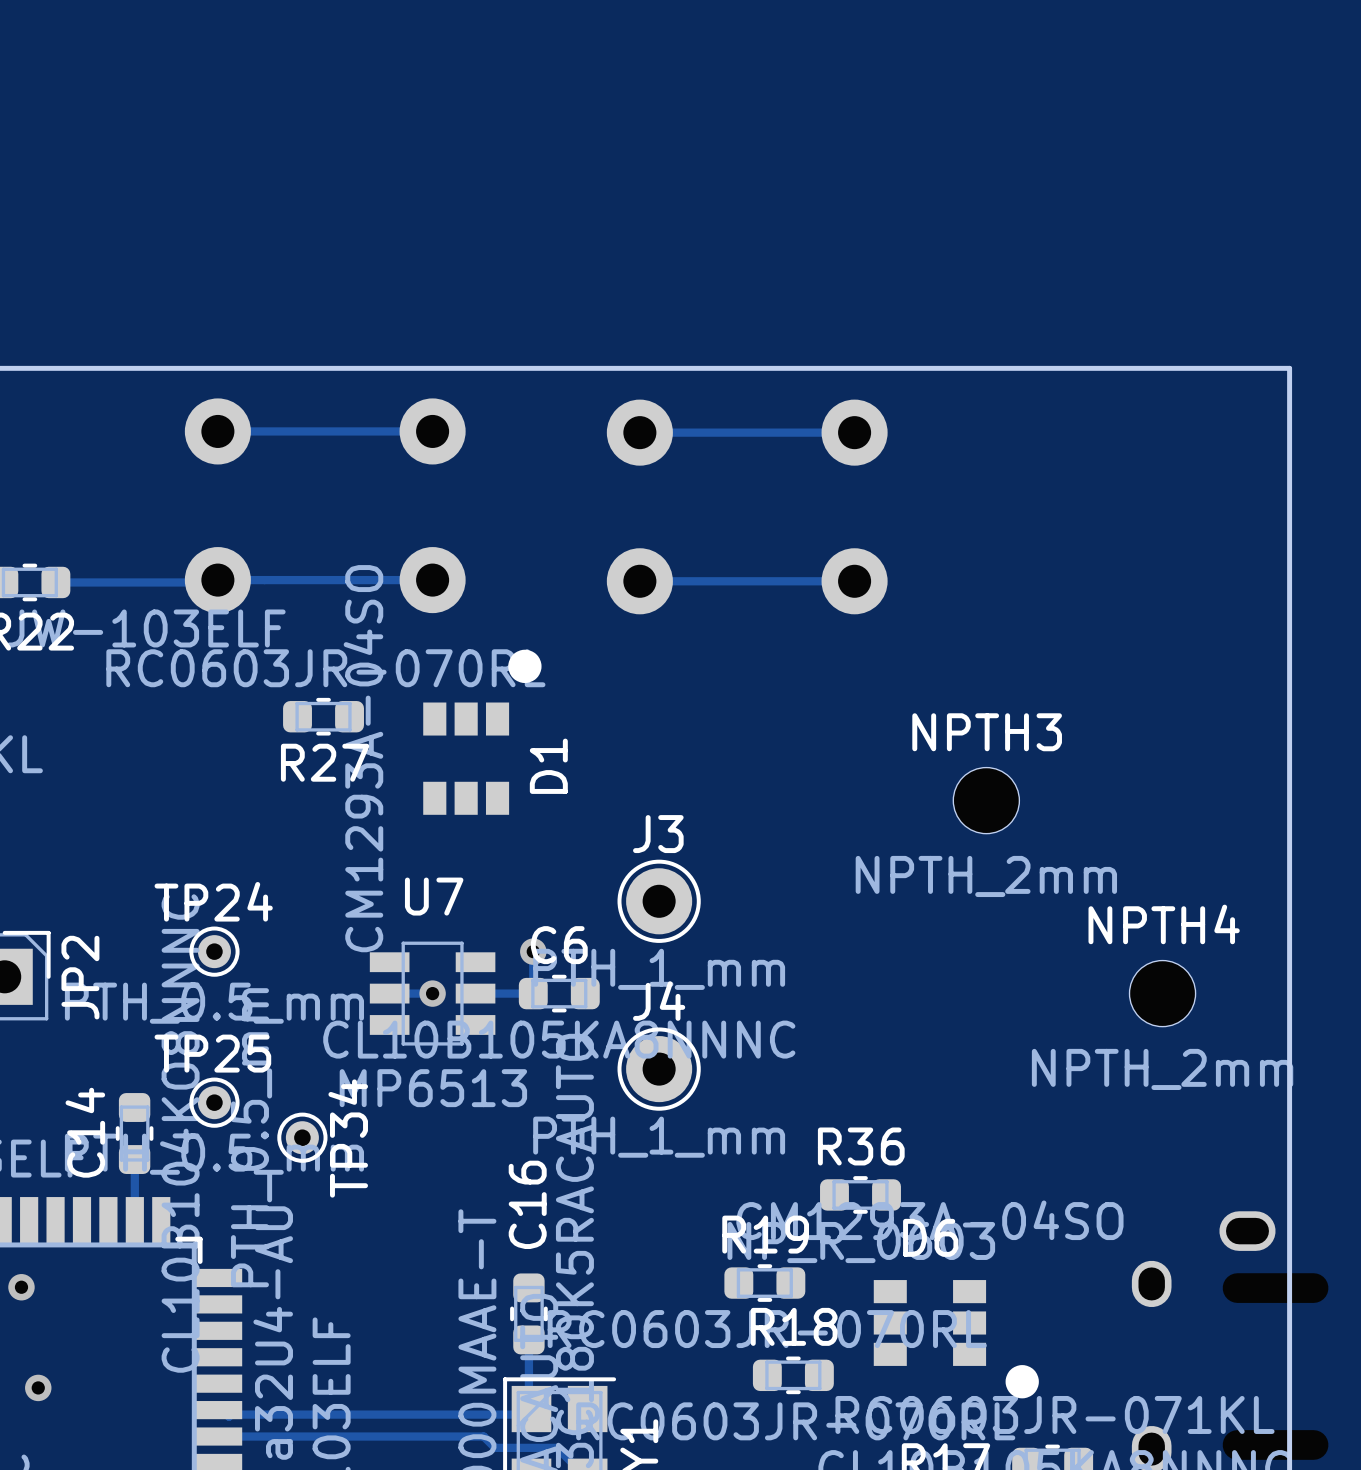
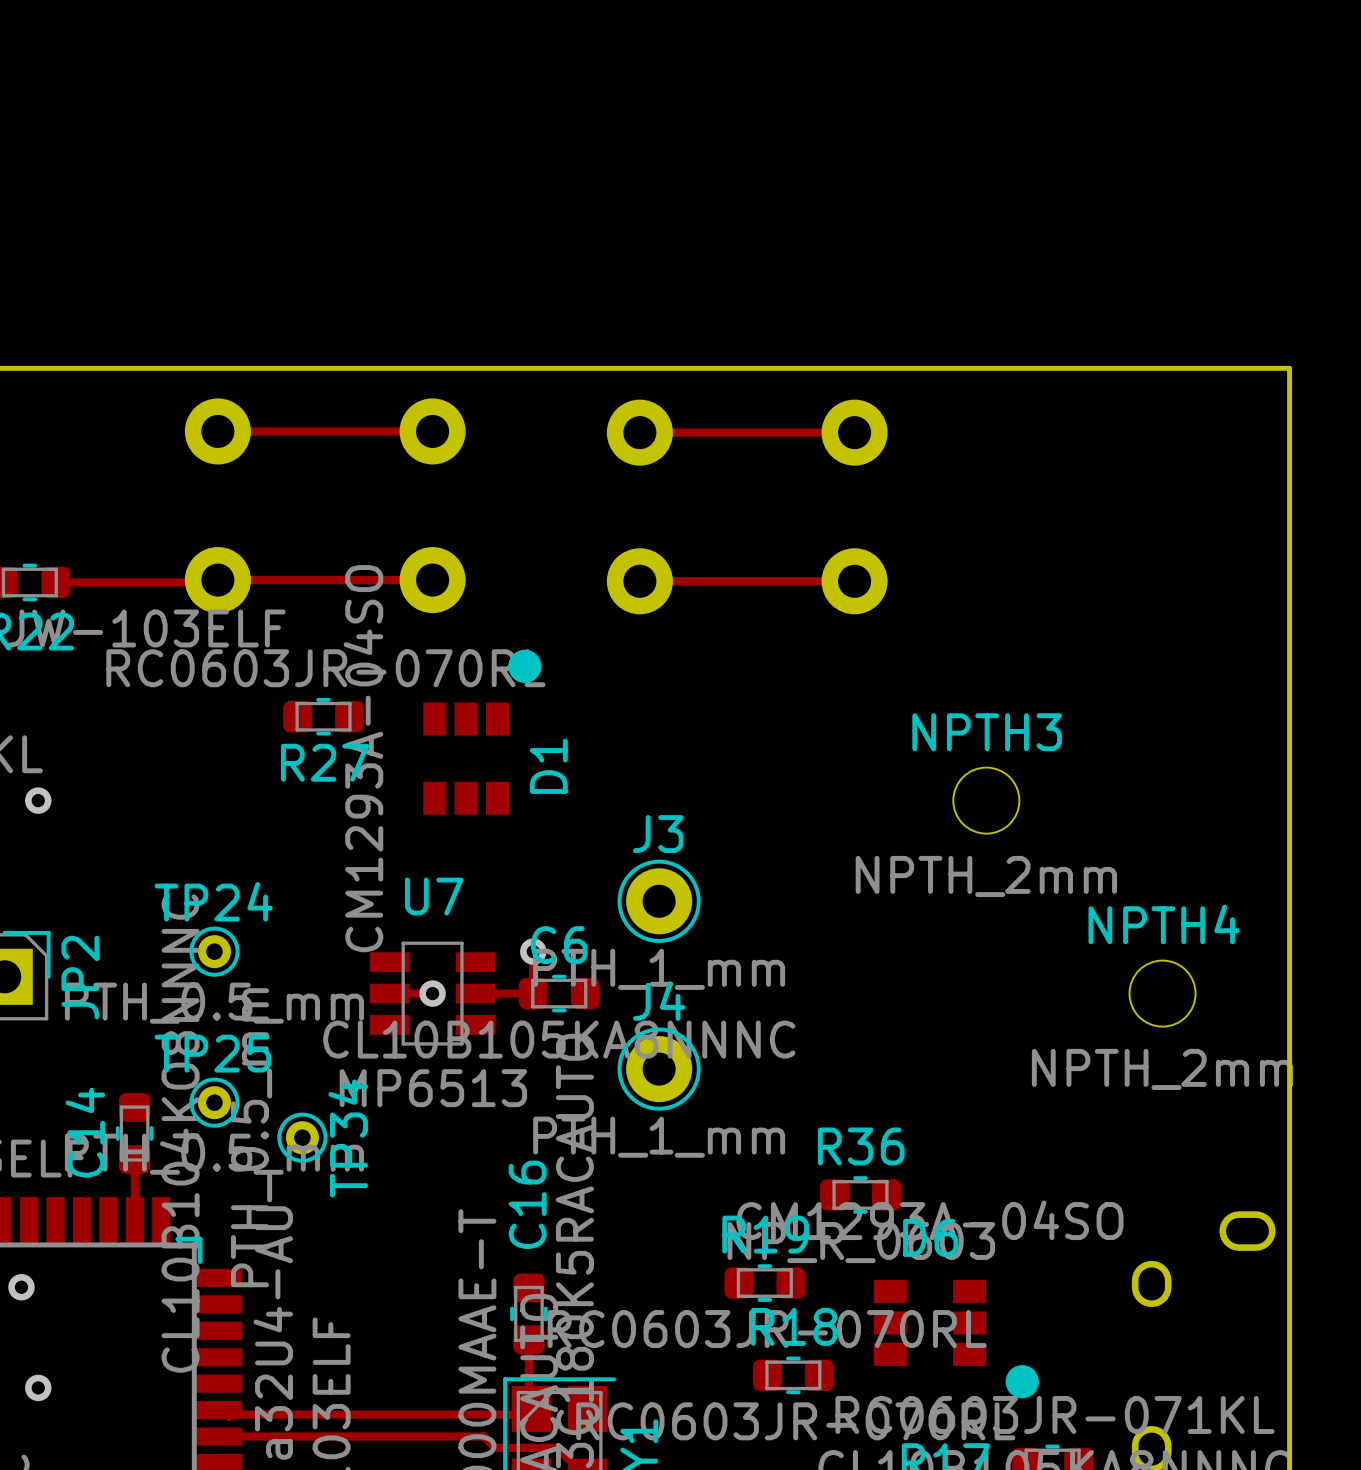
via: none -> (38, 800)

